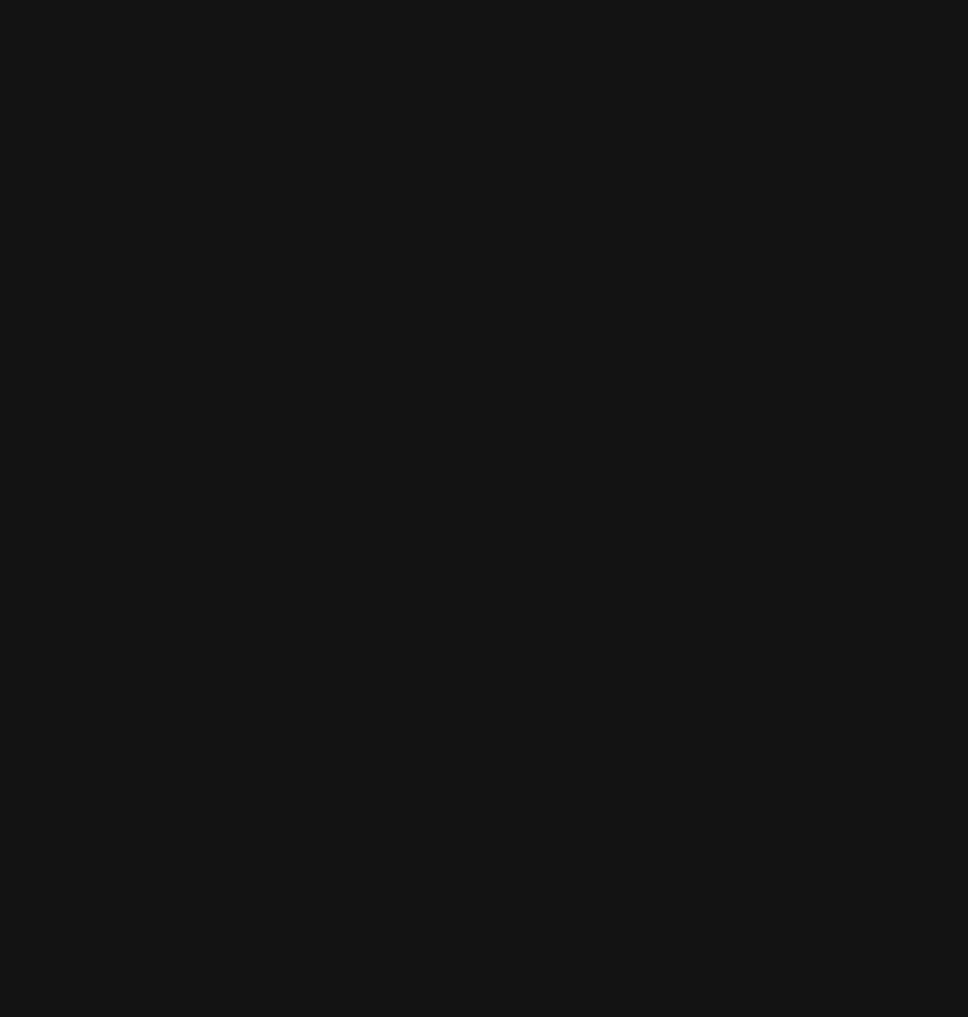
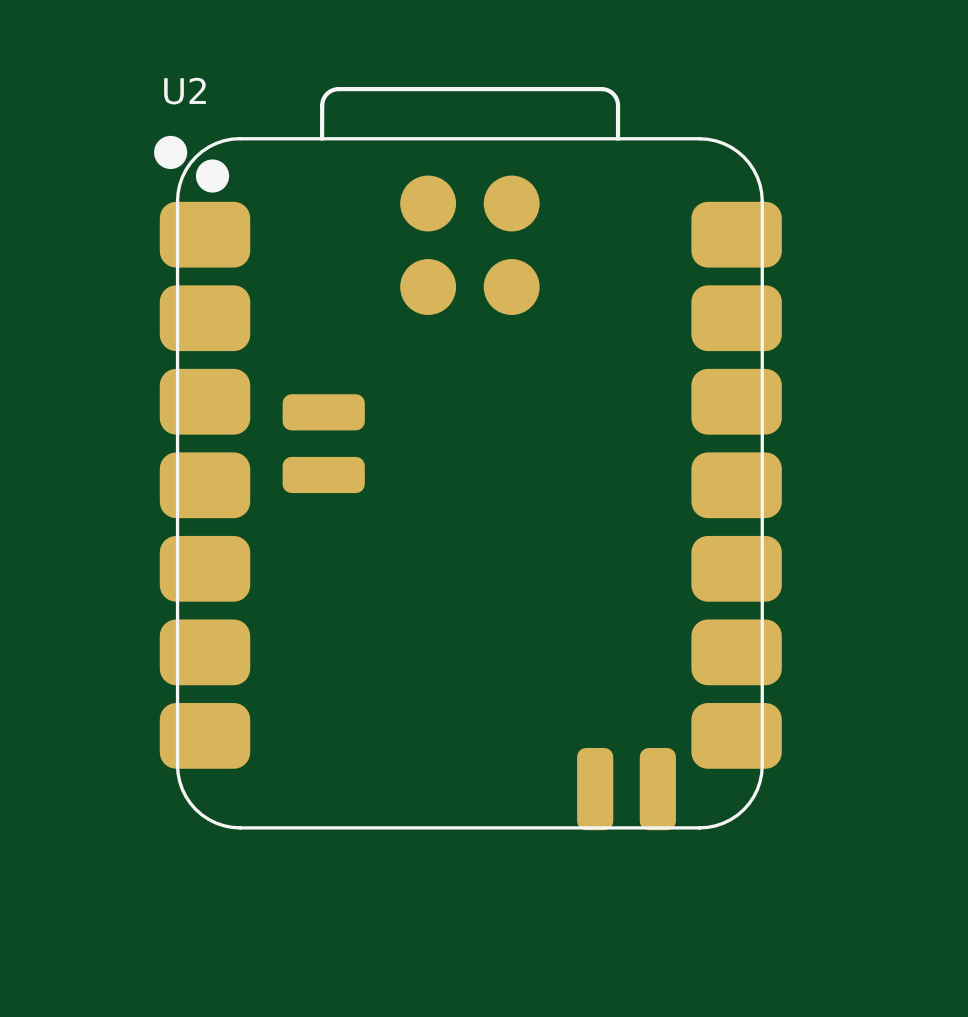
U2: none -> (467, 458)

